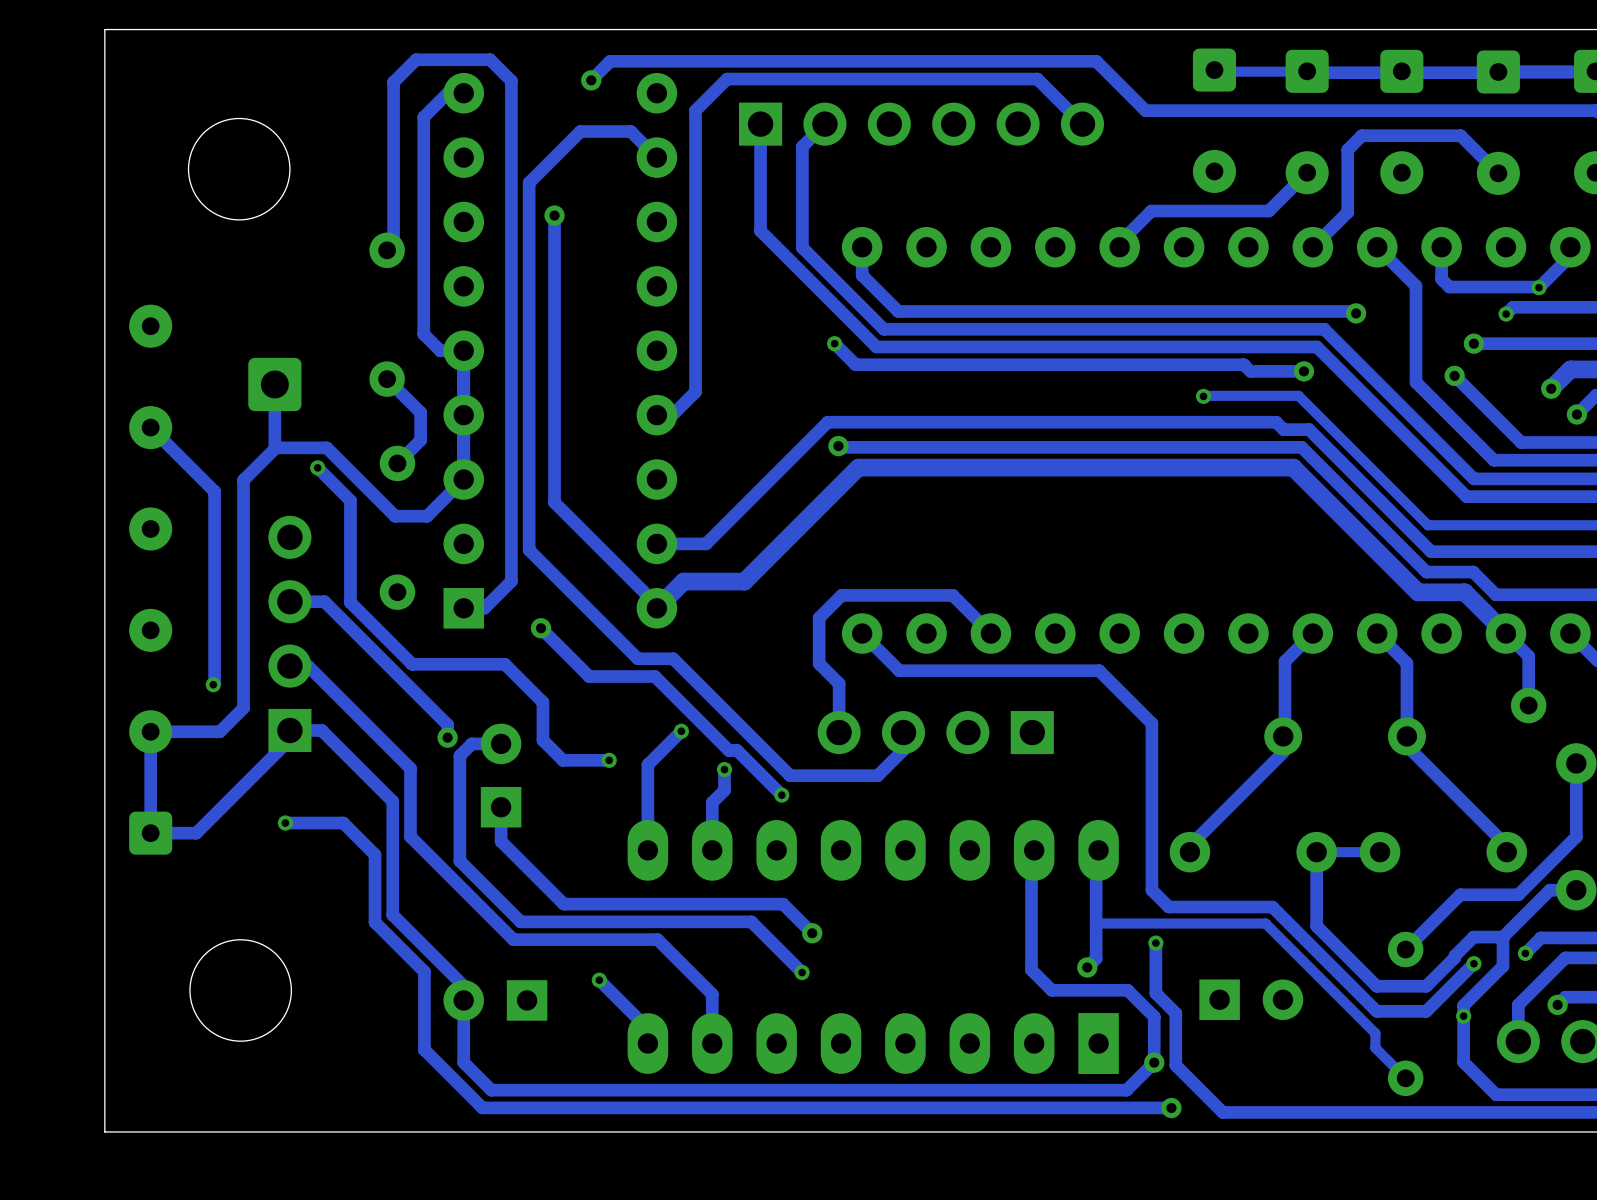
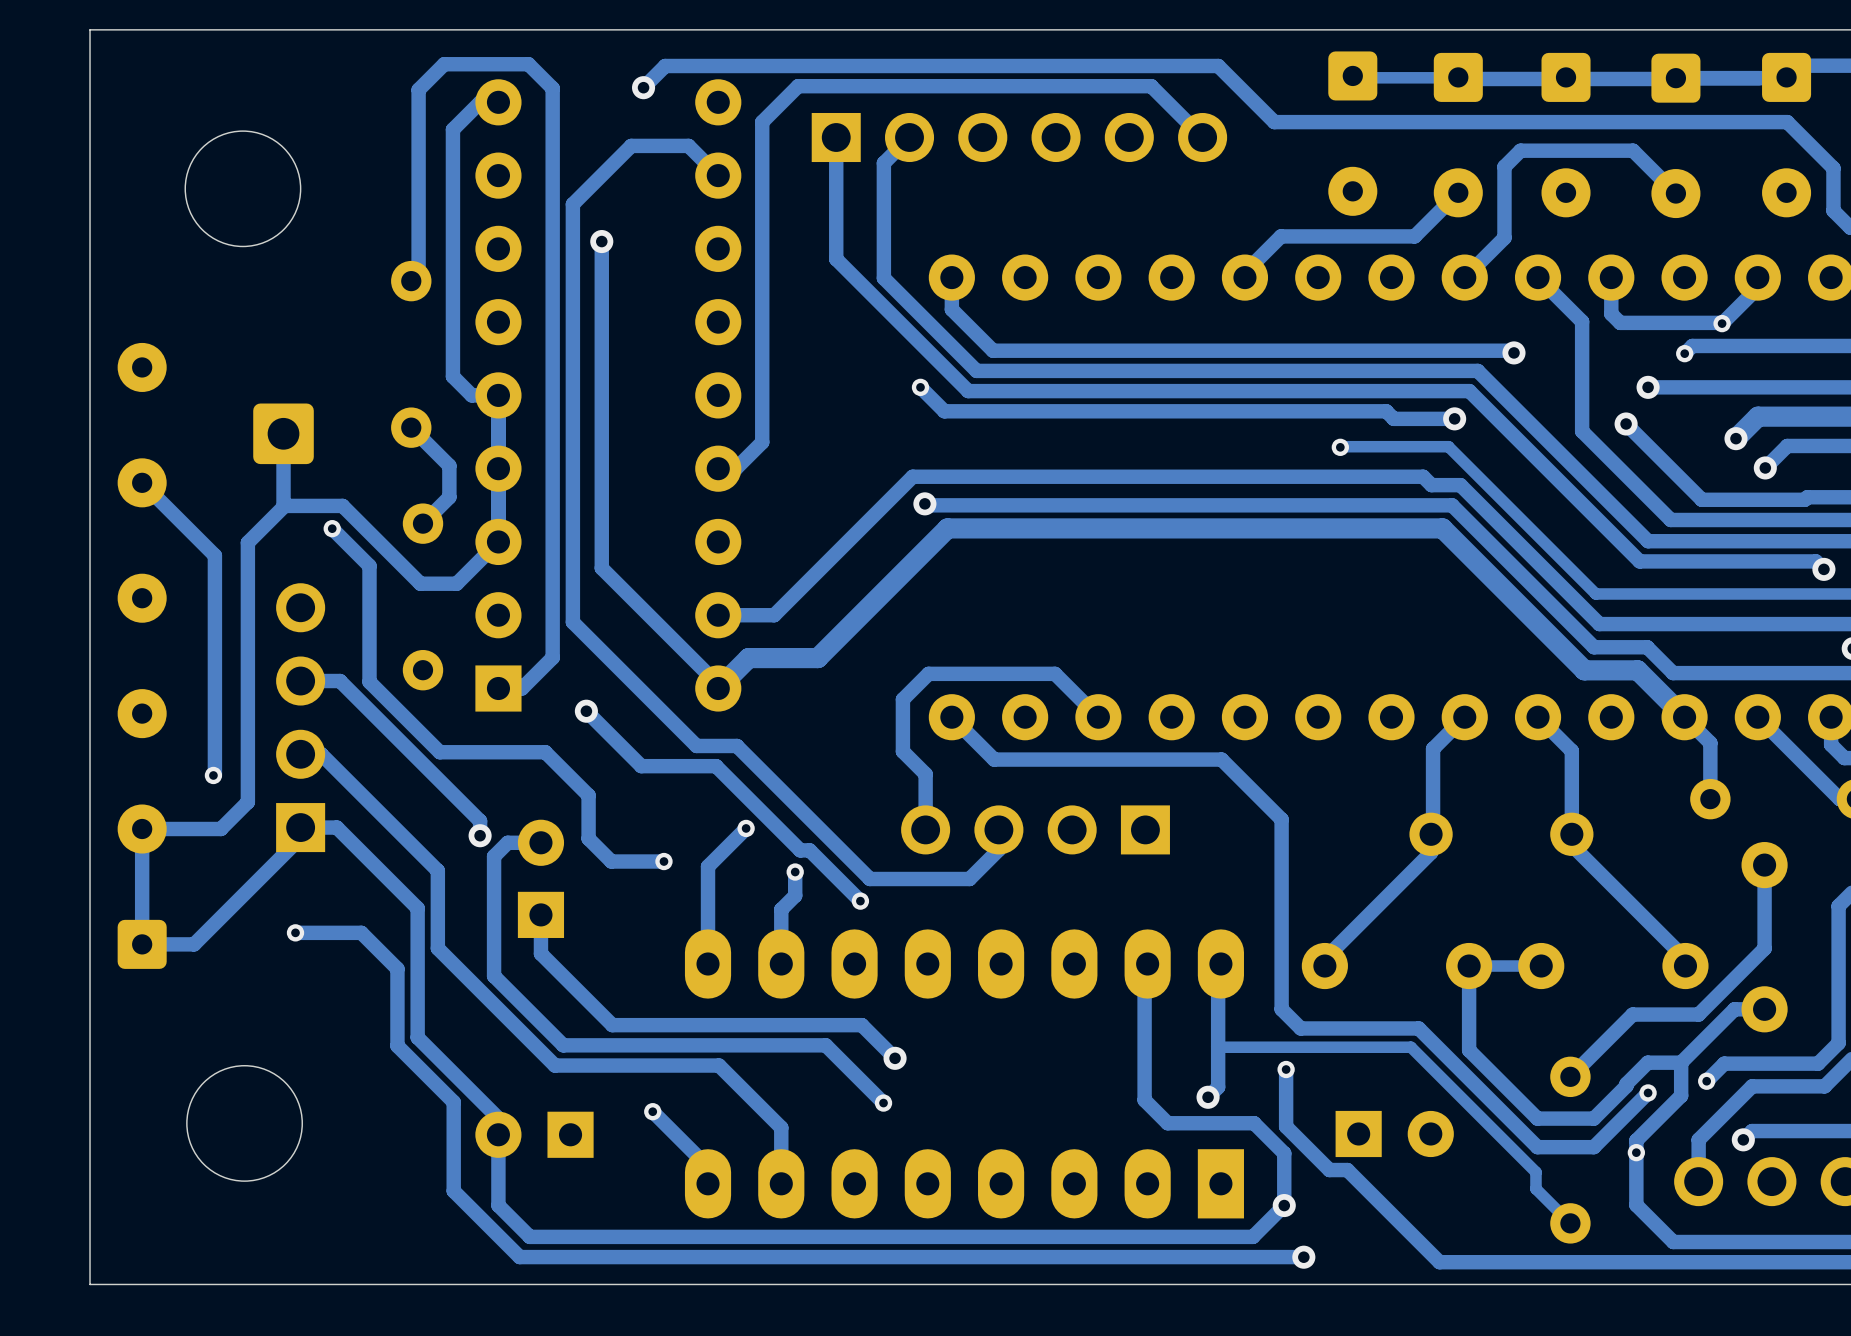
track: (1175, 1013) (1175, 1065) (1222, 1112) (1290, 1112) -> (1308, 1149) (1329, 1170) (1347, 1170) (1439, 1262)

